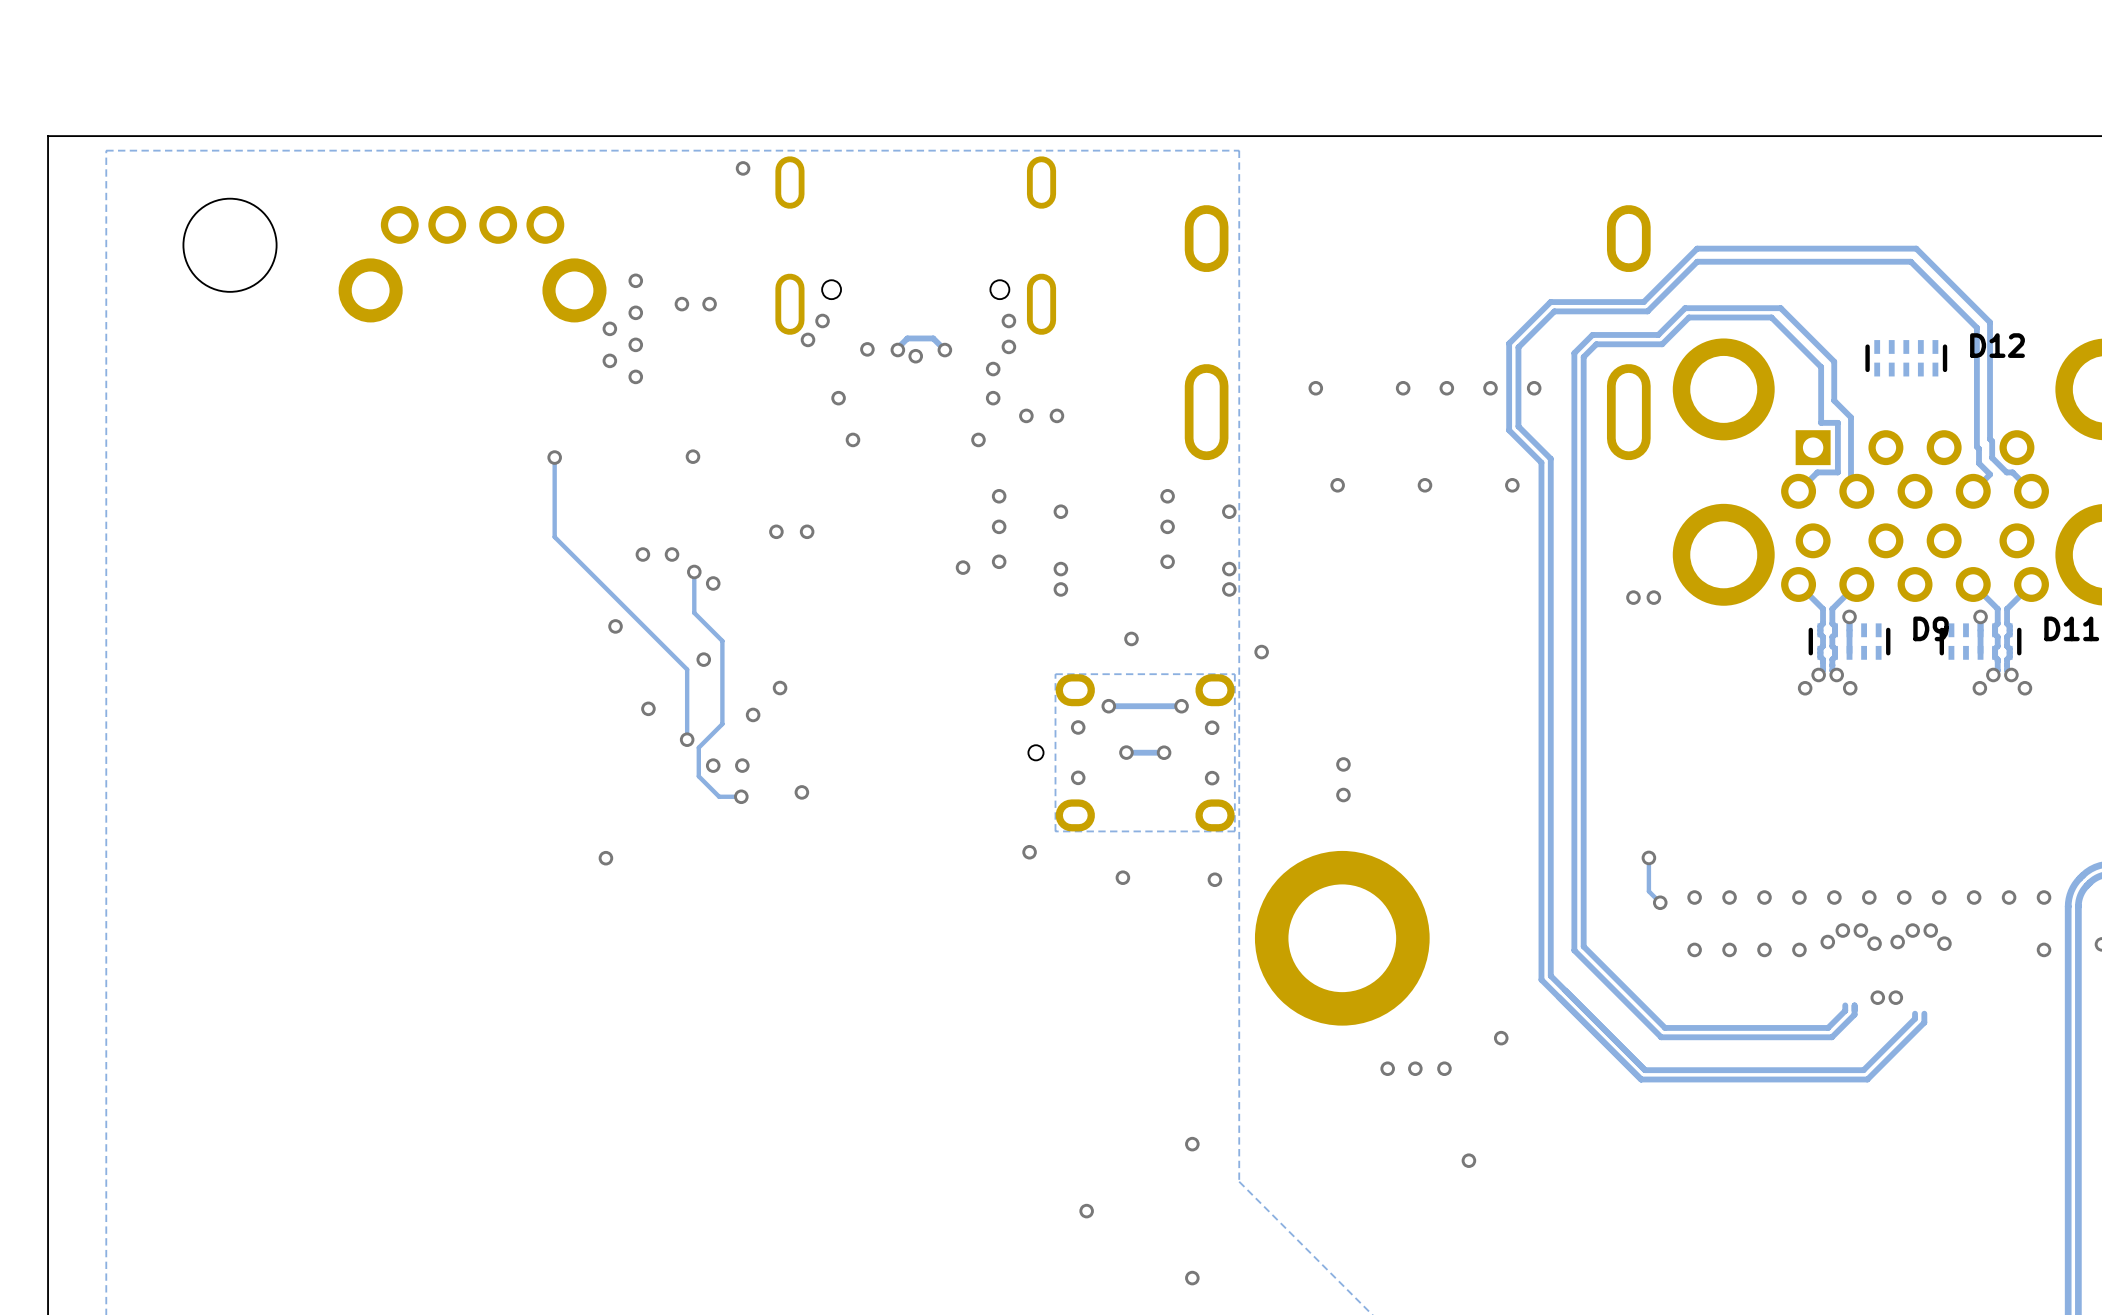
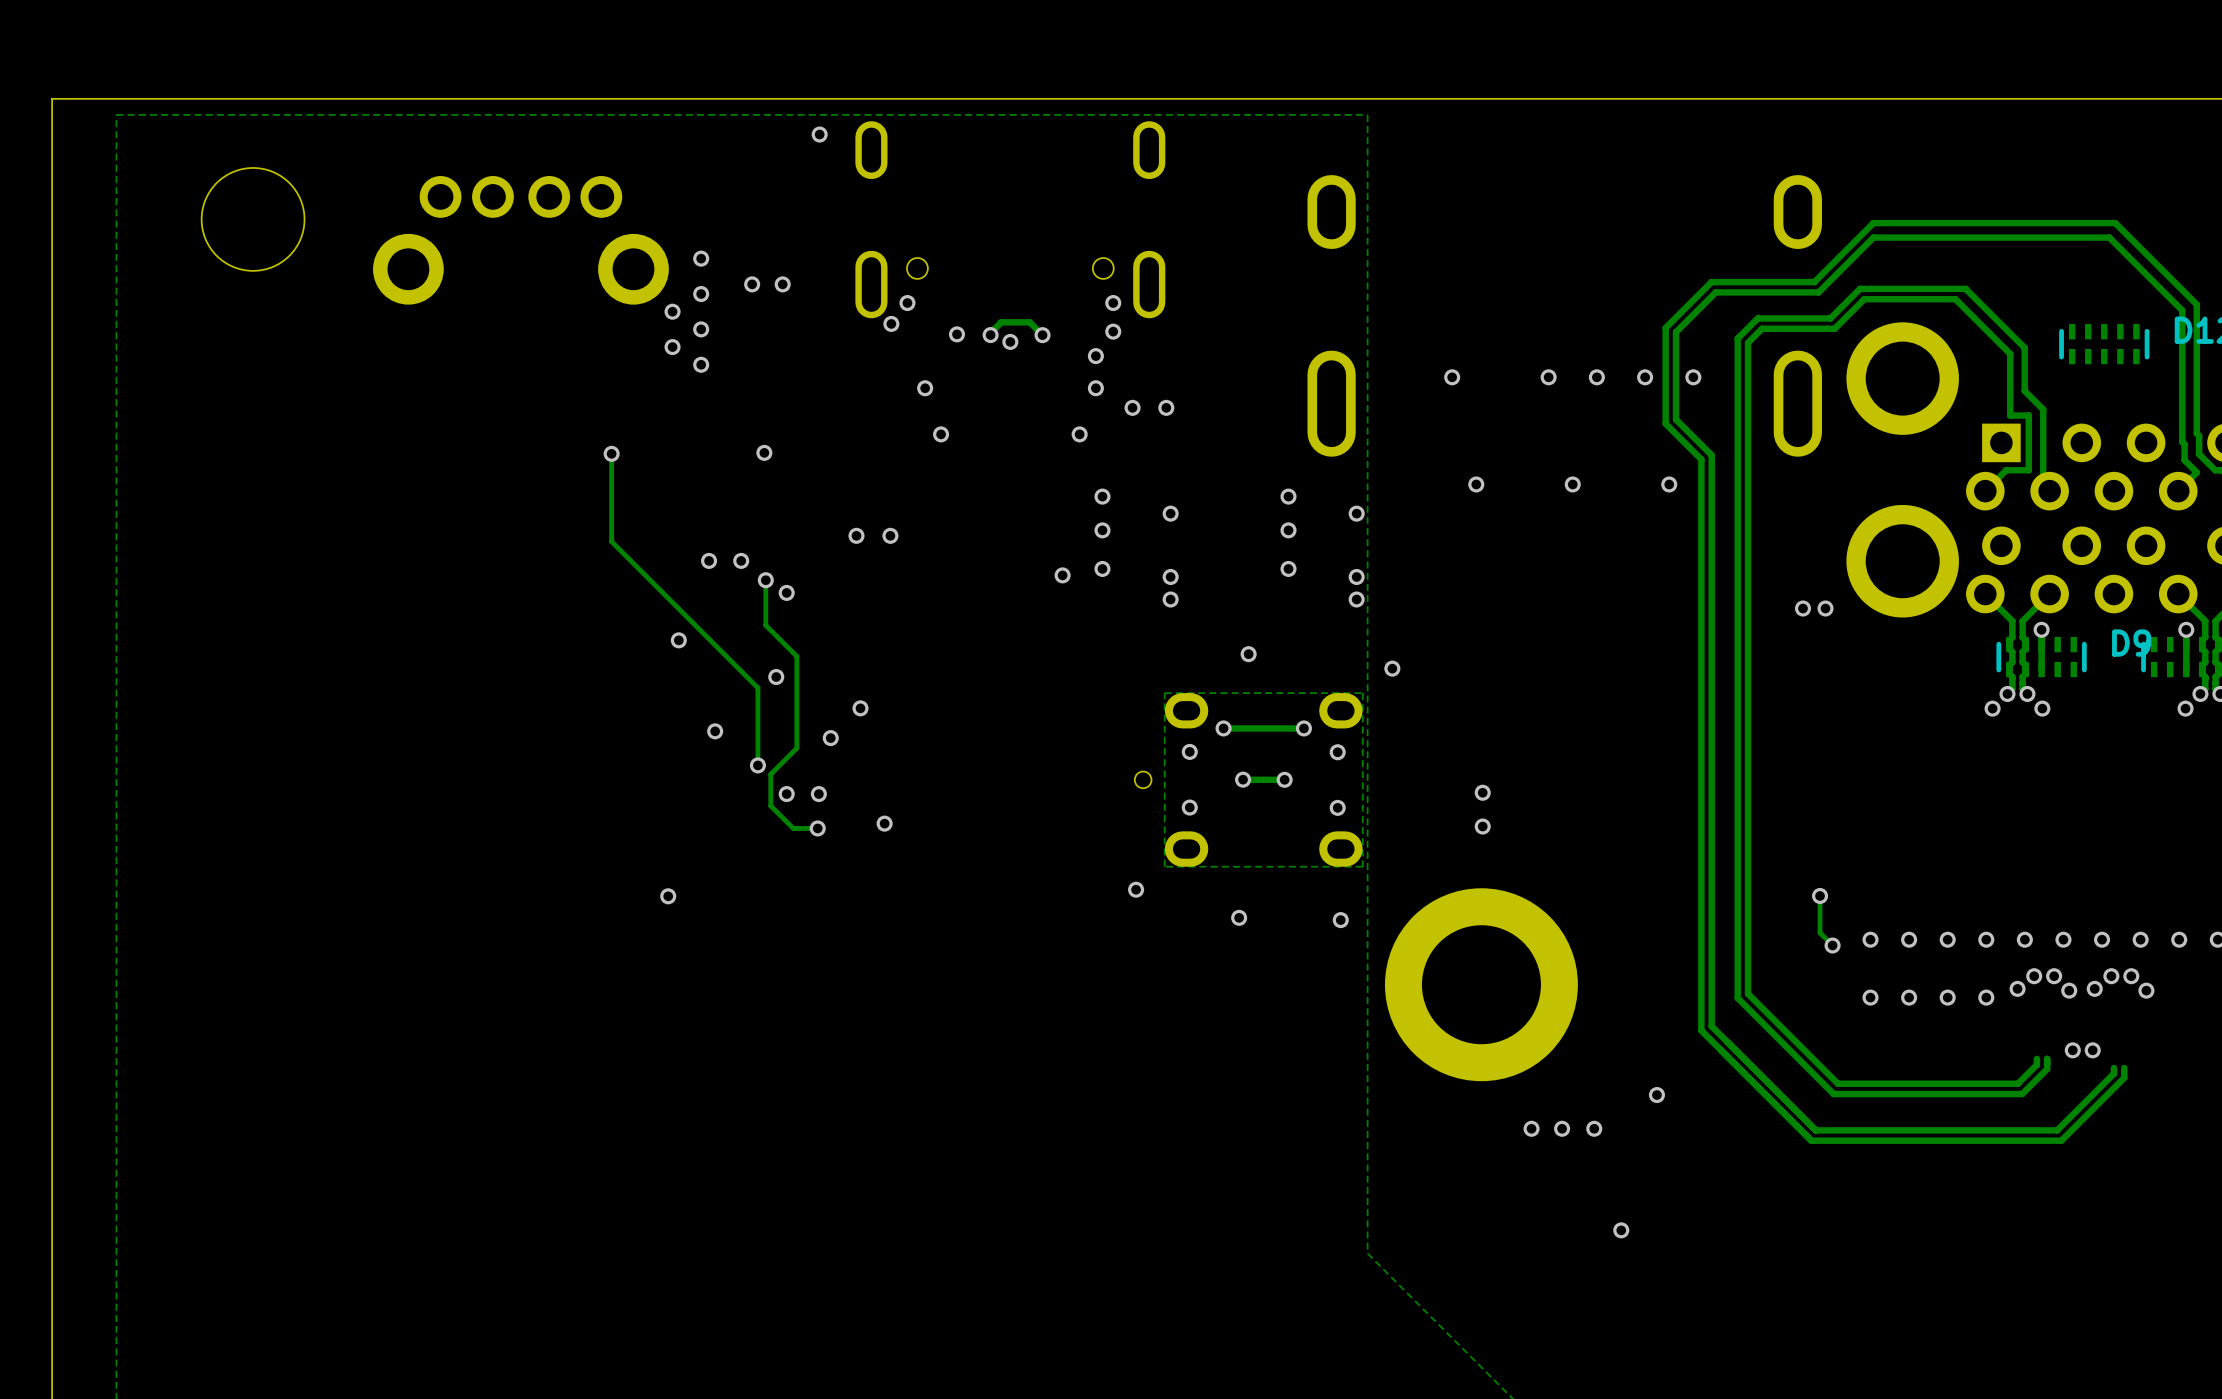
via: (1192, 1144) -> none
via: (1086, 1211) -> none
via: (1192, 1278) -> none

